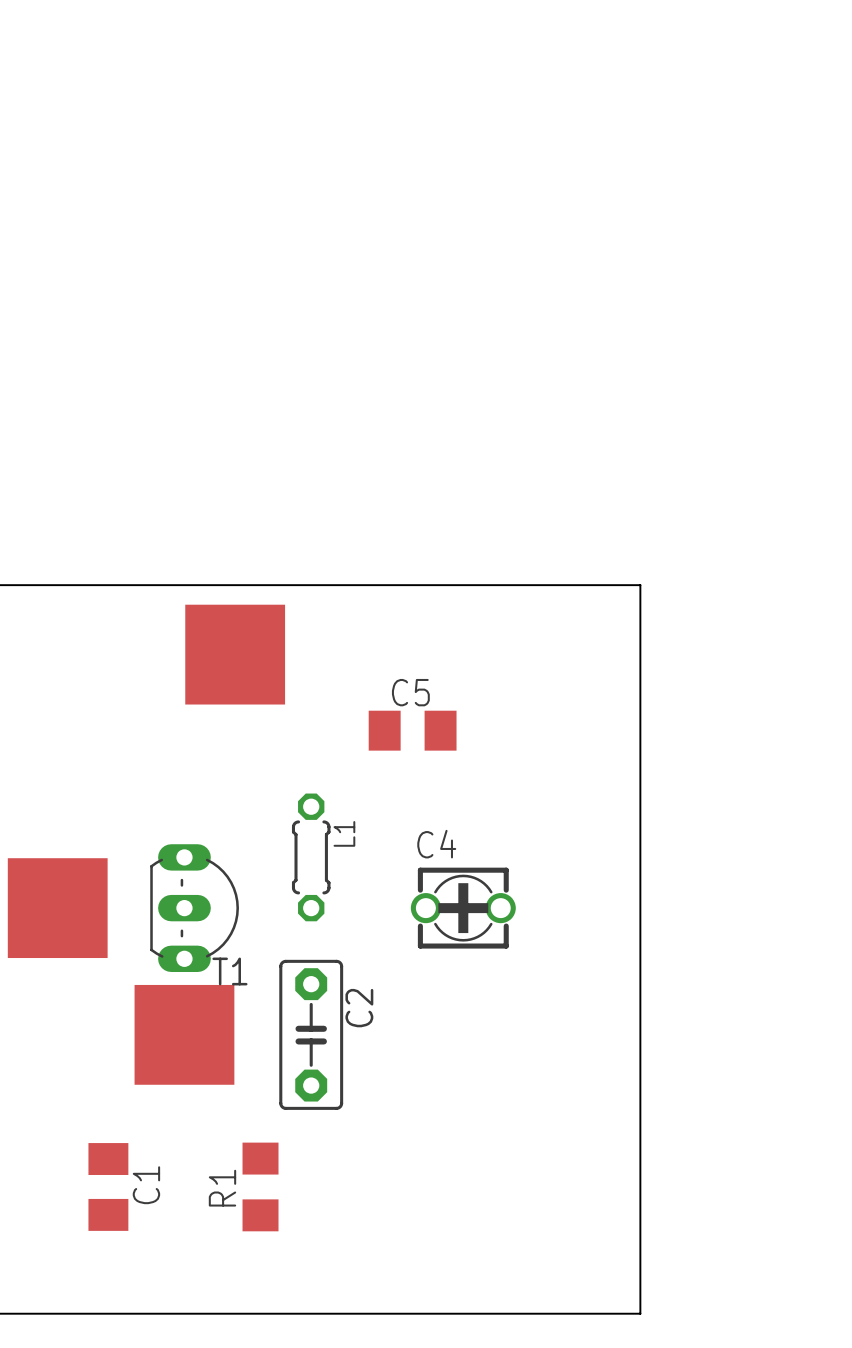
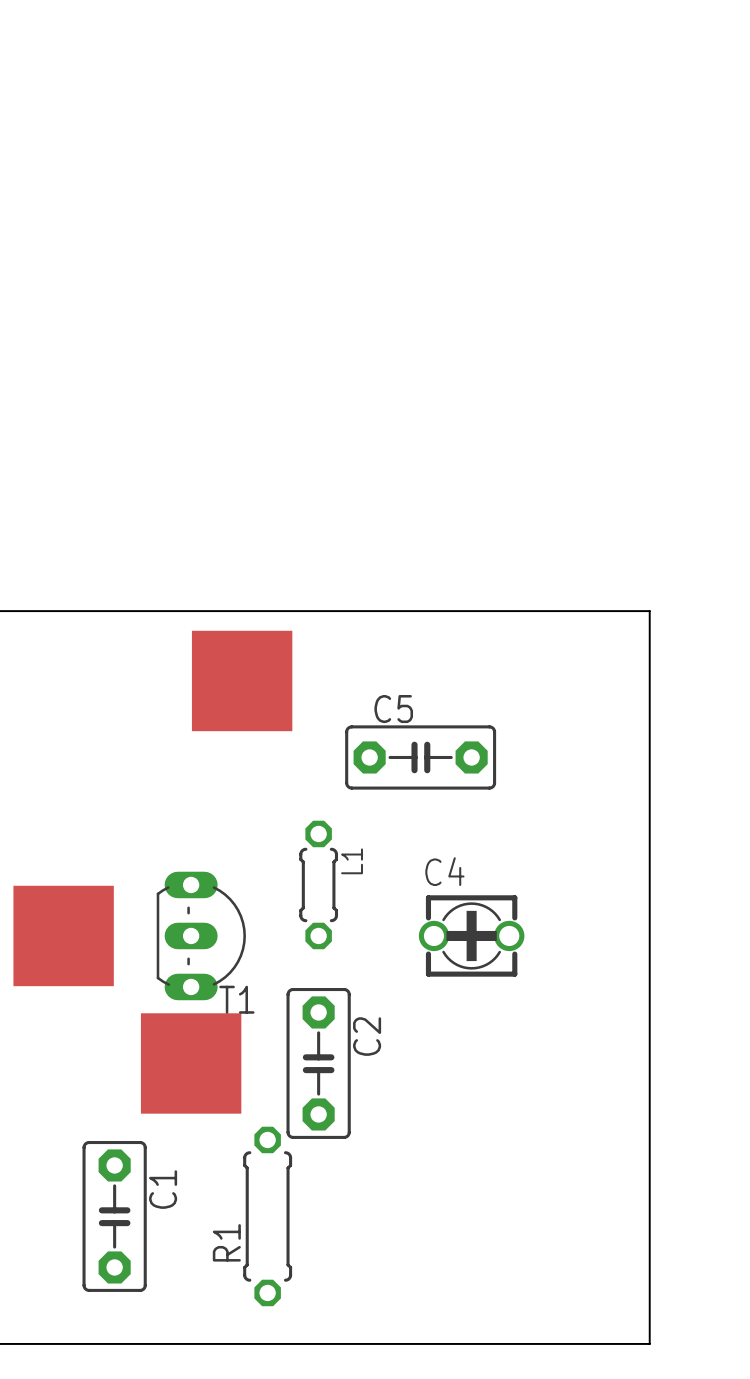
C5 footprint: [368, 710, 457, 751] -> [345, 725, 497, 790]
R1 footprint: [242, 1142, 279, 1232] -> [243, 1126, 293, 1307]
C1 footprint: [88, 1143, 129, 1231] -> [82, 1140, 147, 1292]

